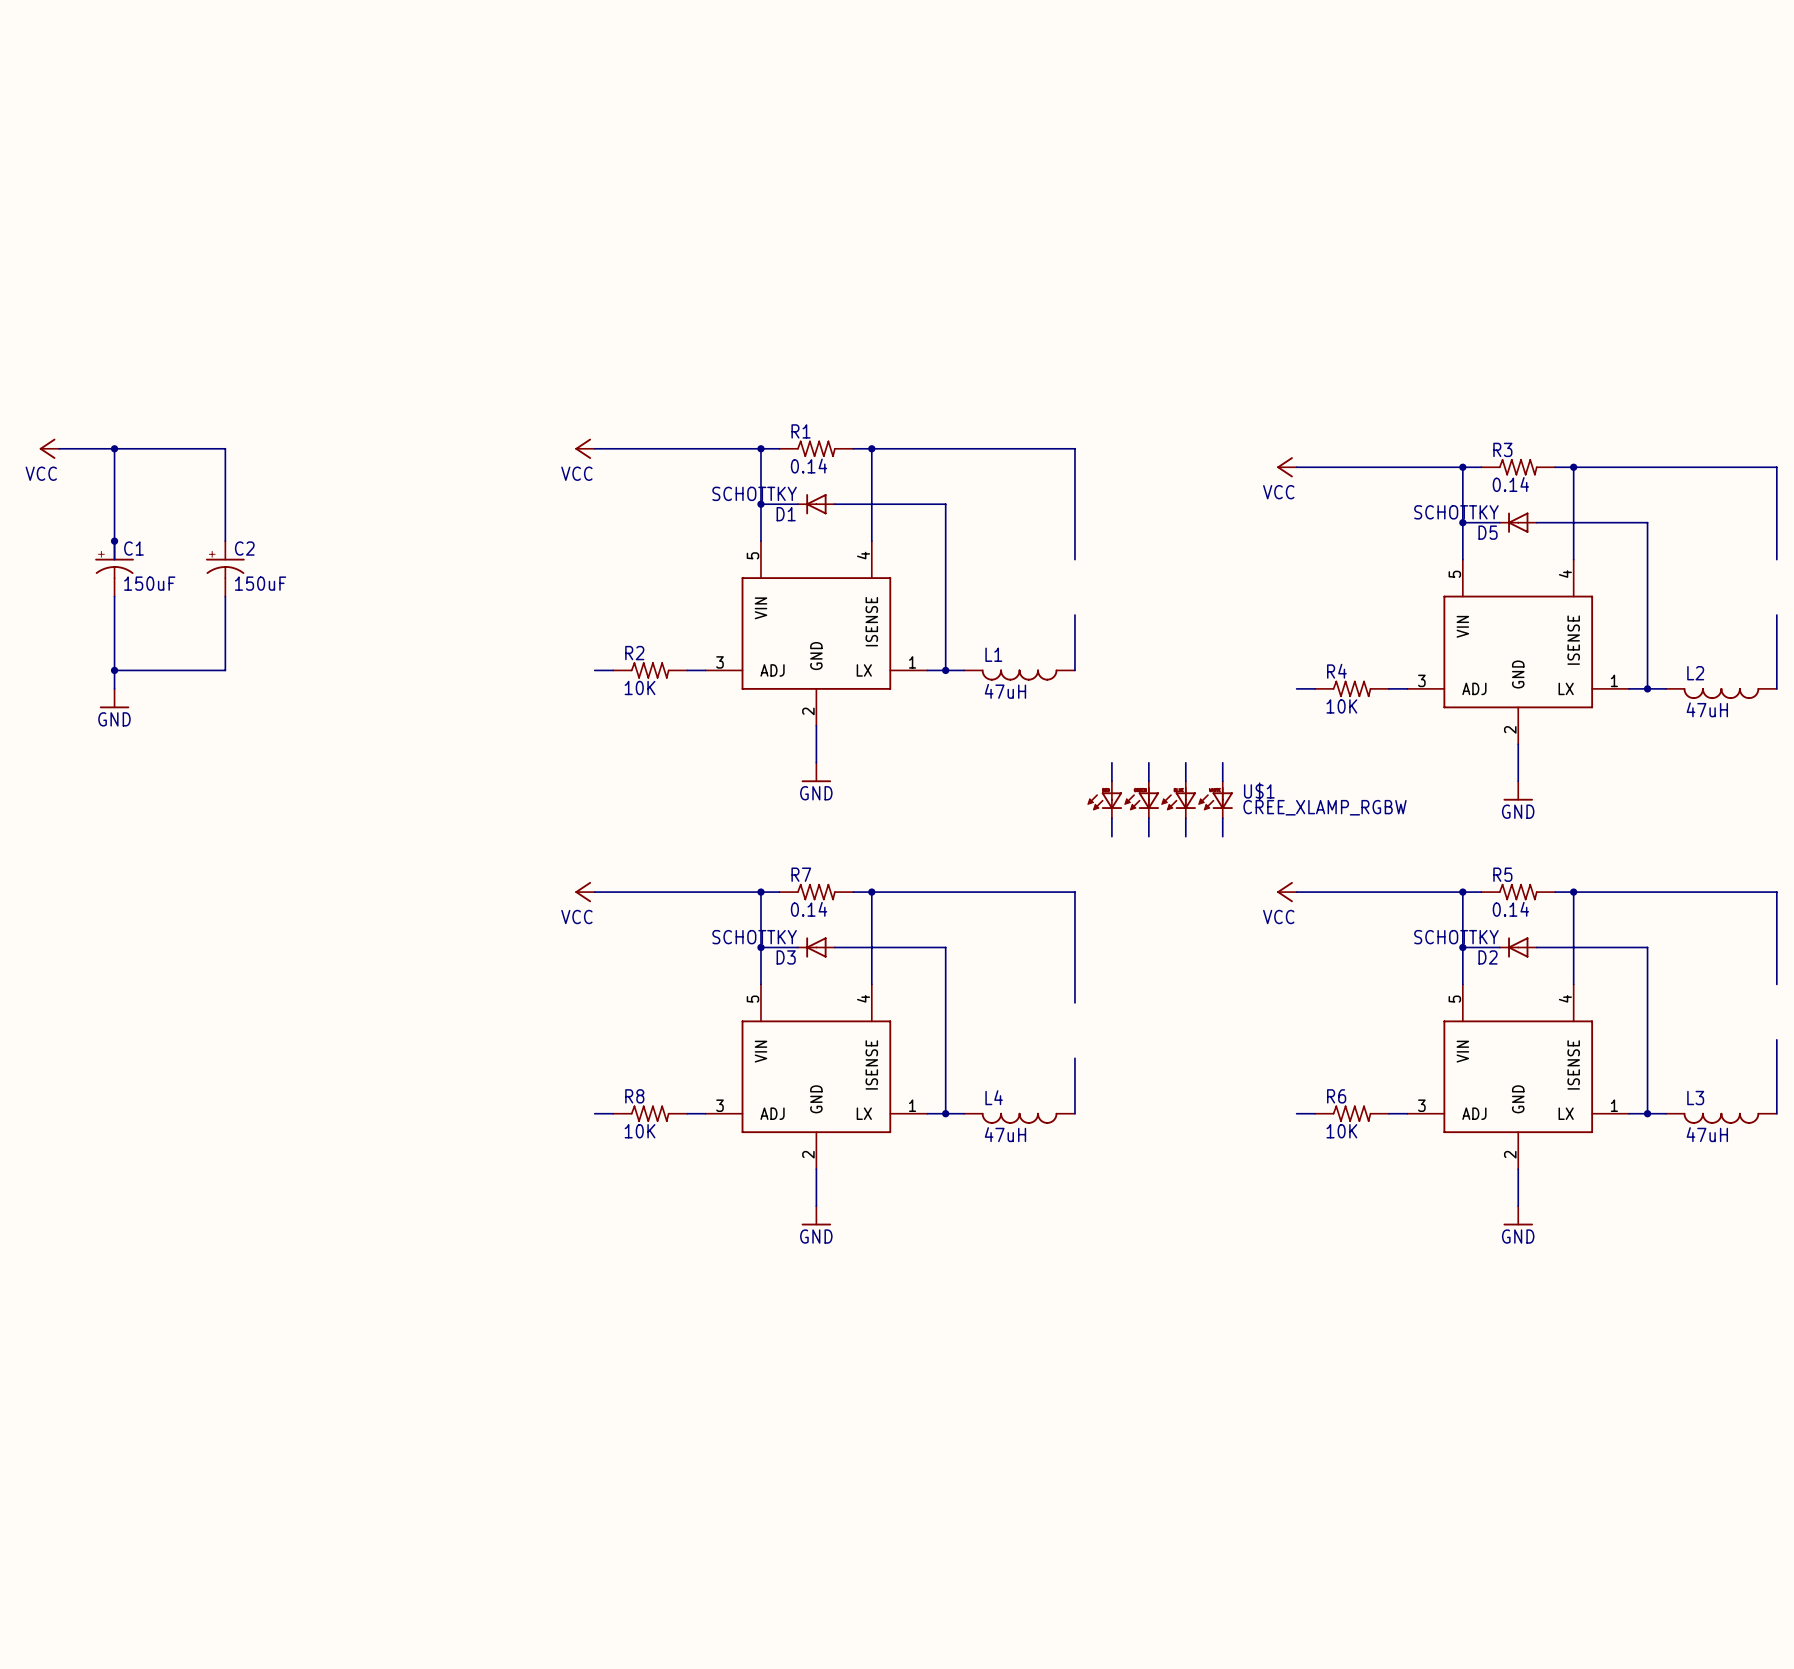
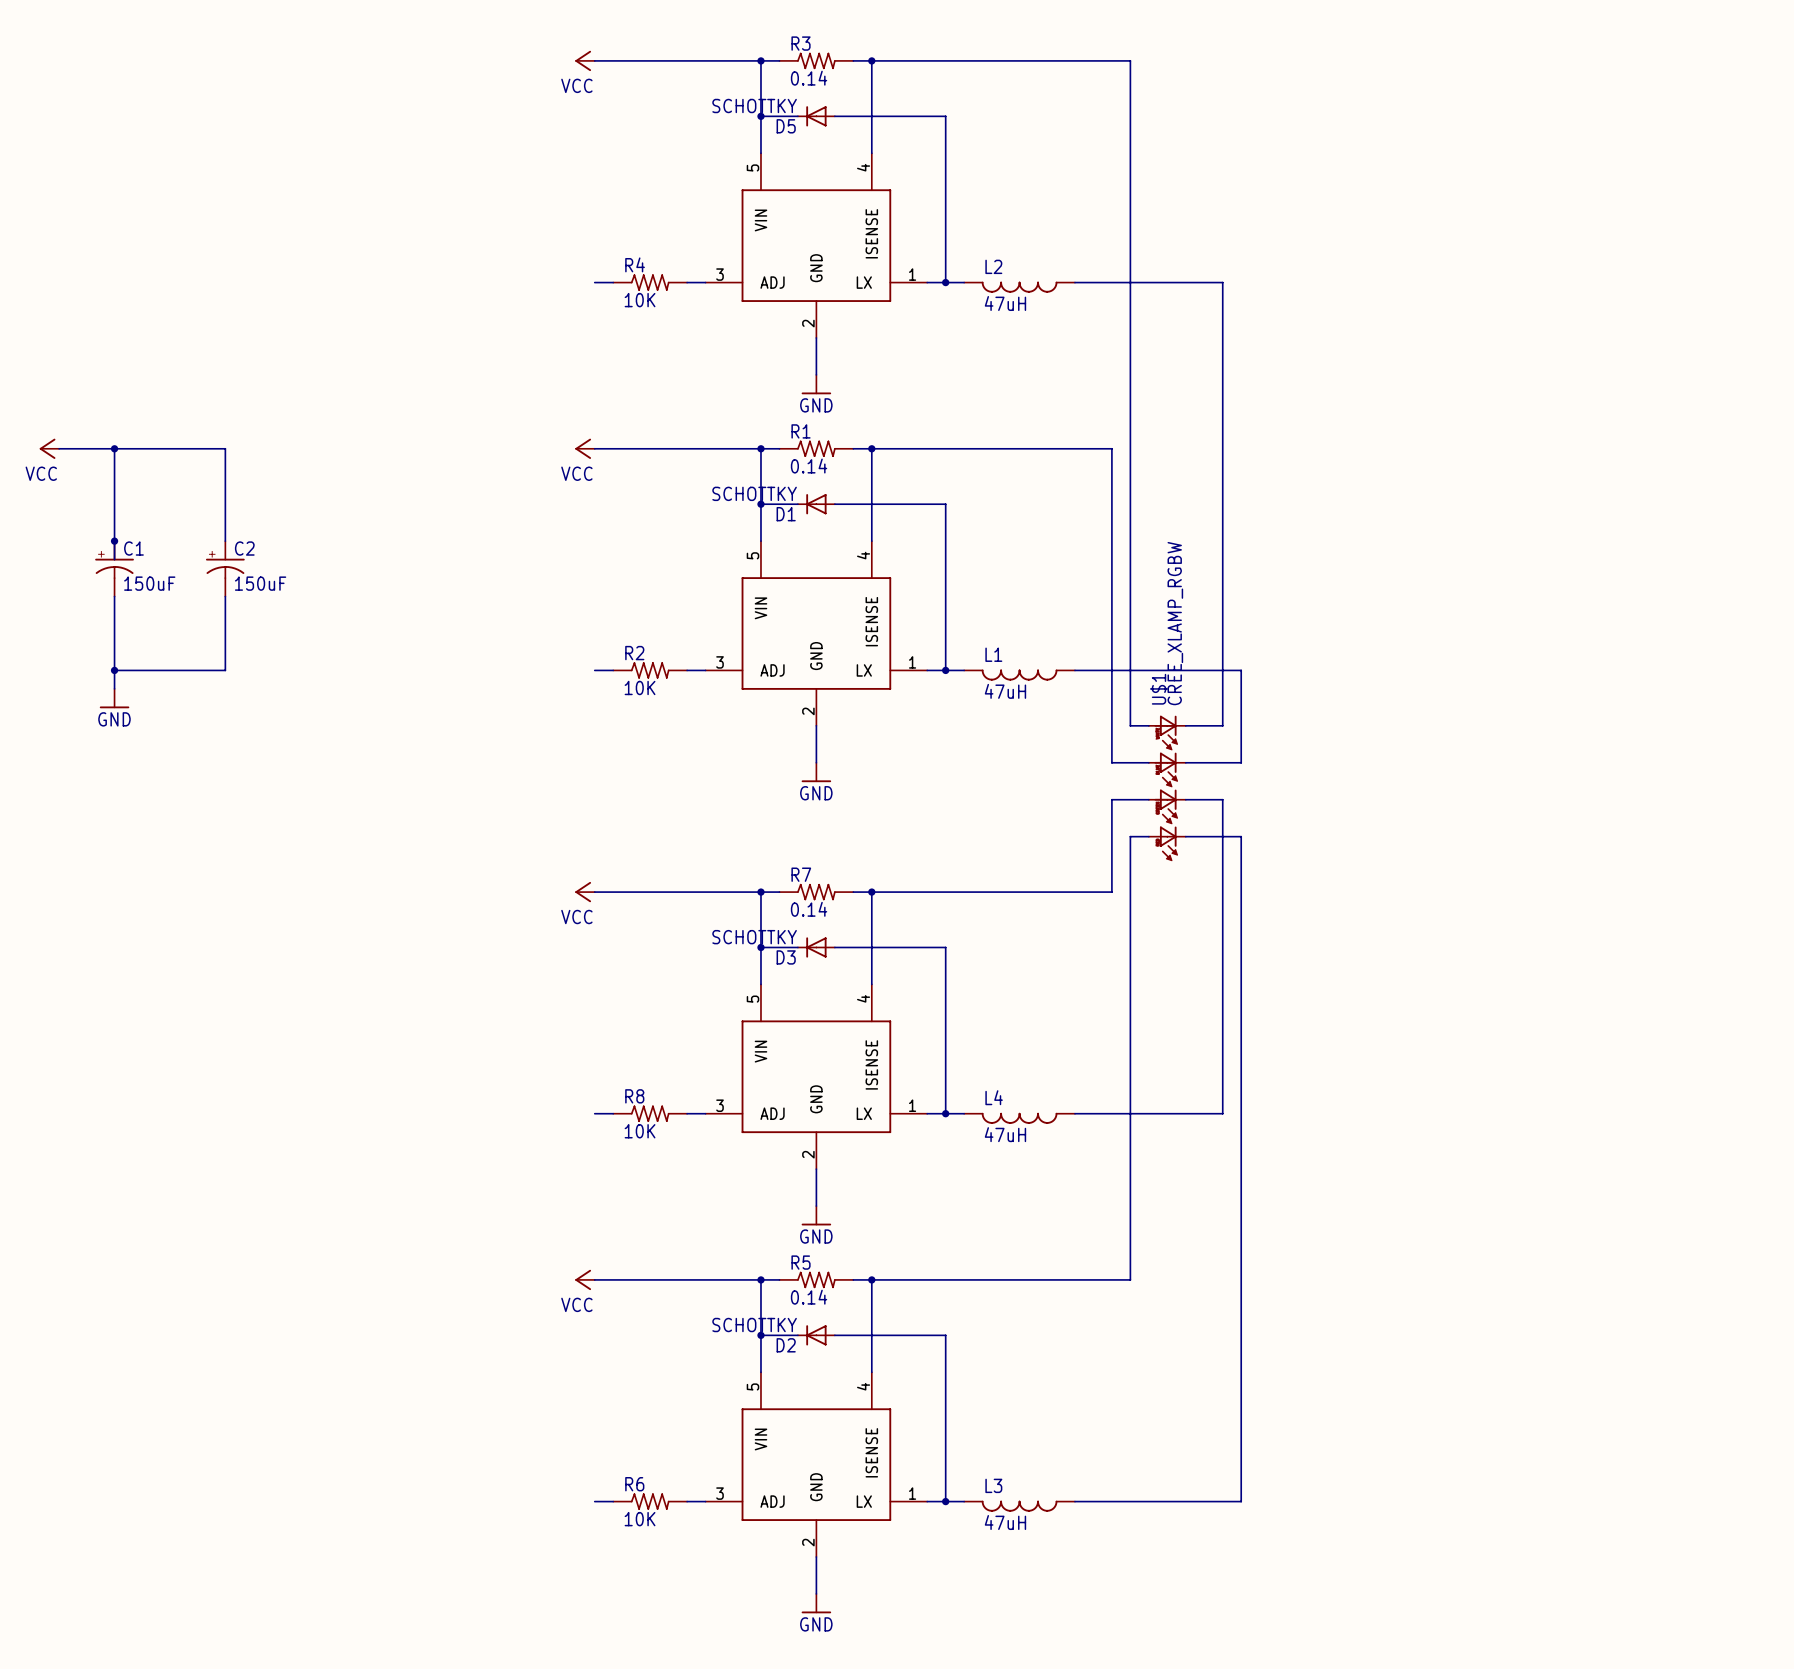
power symbol: none -> VCC (585, 60)
wire: none -> (594, 60) (779, 60)
wire: none -> (760, 60) (760, 153)
junction: none -> (760, 60)
wire: none -> (853, 60) (1130, 60) (1130, 725) (1148, 725)
wire: none -> (871, 60) (871, 153)
junction: none -> (871, 60)
wire: none -> (760, 116) (797, 116)
junction: none -> (760, 116)
wire: none -> (834, 116) (945, 116) (945, 282)
part: none -> (816, 245)
wire: none -> (594, 282) (613, 282)
wire: none -> (687, 282) (705, 282)
wire: none -> (927, 282) (964, 282)
junction: none -> (945, 282)
wire: none -> (1074, 282) (1222, 282) (1222, 725) (1185, 725)
wire: none -> (816, 337) (816, 374)
power symbol: none -> GND (816, 384)
wire: (1074, 448) (1074, 559) -> (1074, 448) (1111, 448) (1111, 762) (1148, 762)
power symbol: VCC (1286, 467) -> none
wire: (1296, 467) (1481, 467) -> none
wire: (1462, 467) (1462, 559) -> none
junction: (1462, 467) -> none
R3 position: (1518, 467) -> (816, 60)
wire: (1555, 467) (1776, 467) (1776, 559) -> none
wire: (1573, 467) (1573, 559) -> none
junction: (1573, 467) -> none
wire: (1462, 522) (1499, 522) -> none
junction: (1462, 522) -> none
D5 position: (1518, 522) -> (816, 116)
wire: (1536, 522) (1647, 522) (1647, 688) -> none
wire: (1074, 615) (1074, 670) -> none
wire: (1776, 615) (1776, 688) -> none
part: (1518, 651) -> none
wire: (1296, 688) (1315, 688) -> none
R4 position: (1352, 688) -> (650, 282)
wire: (1388, 688) (1407, 688) -> none
wire: (1629, 688) (1666, 688) -> none
junction: (1647, 688) -> none
L2 position: (1721, 693) -> (1019, 287)
wire: (1518, 744) (1518, 781) -> none
wire: (1111, 762) (1111, 781) -> none
wire: (1148, 762) (1148, 781) -> none
wire: (1185, 762) (1185, 781) -> (1185, 762) (1241, 762) (1241, 670) (1074, 670)
wire: (1222, 762) (1222, 781) -> none
power symbol: GND (1518, 790) -> none
U$1 rotation: 0° (1160, 798) -> 90° counterclockwise (1166, 788)
wire: (1148, 818) (1148, 836) -> (853, 1279) (1130, 1279) (1130, 836) (1148, 836)
wire: (1185, 818) (1185, 836) -> (1074, 1501) (1241, 1501) (1241, 836) (1185, 836)
wire: (1074, 892) (1074, 1002) -> (1074, 892) (1111, 892) (1111, 836)
power symbol: VCC (1286, 892) -> none
wire: (1296, 892) (1481, 892) -> none
wire: (1462, 892) (1462, 984) -> none
junction: (1462, 892) -> none
R5 position: (1518, 892) -> (816, 1279)
wire: (1555, 892) (1776, 892) (1776, 984) -> none
wire: (1573, 892) (1573, 984) -> none
junction: (1573, 892) -> none
wire: (1462, 947) (1499, 947) -> none
junction: (1462, 947) -> none
D2 position: (1518, 947) -> (816, 1335)
wire: (1536, 947) (1647, 947) (1647, 1113) -> none
wire: (1776, 1039) (1776, 1113) -> none
wire: (1074, 1058) (1074, 1113) -> (1222, 836) (1222, 1113) (1074, 1113)
part: (1518, 1076) -> none
wire: (1296, 1113) (1315, 1113) -> none
R6 position: (1352, 1113) -> (650, 1501)
wire: (1388, 1113) (1407, 1113) -> none
wire: (1629, 1113) (1666, 1113) -> none
junction: (1647, 1113) -> none
L3 position: (1721, 1118) -> (1019, 1506)
wire: (1518, 1169) (1518, 1206) -> none
power symbol: GND (1518, 1215) -> none
power symbol: none -> VCC (585, 1279)
wire: none -> (594, 1279) (779, 1279)
wire: none -> (760, 1279) (760, 1372)
junction: none -> (760, 1279)
wire: none -> (871, 1279) (871, 1372)
junction: none -> (871, 1279)
wire: none -> (760, 1335) (797, 1335)
junction: none -> (760, 1335)
wire: none -> (834, 1335) (945, 1335) (945, 1501)
part: none -> (816, 1464)
wire: none -> (594, 1501) (613, 1501)
wire: none -> (687, 1501) (705, 1501)
wire: none -> (927, 1501) (964, 1501)
junction: none -> (945, 1501)
wire: none -> (816, 1556) (816, 1593)
power symbol: none -> GND (816, 1603)

